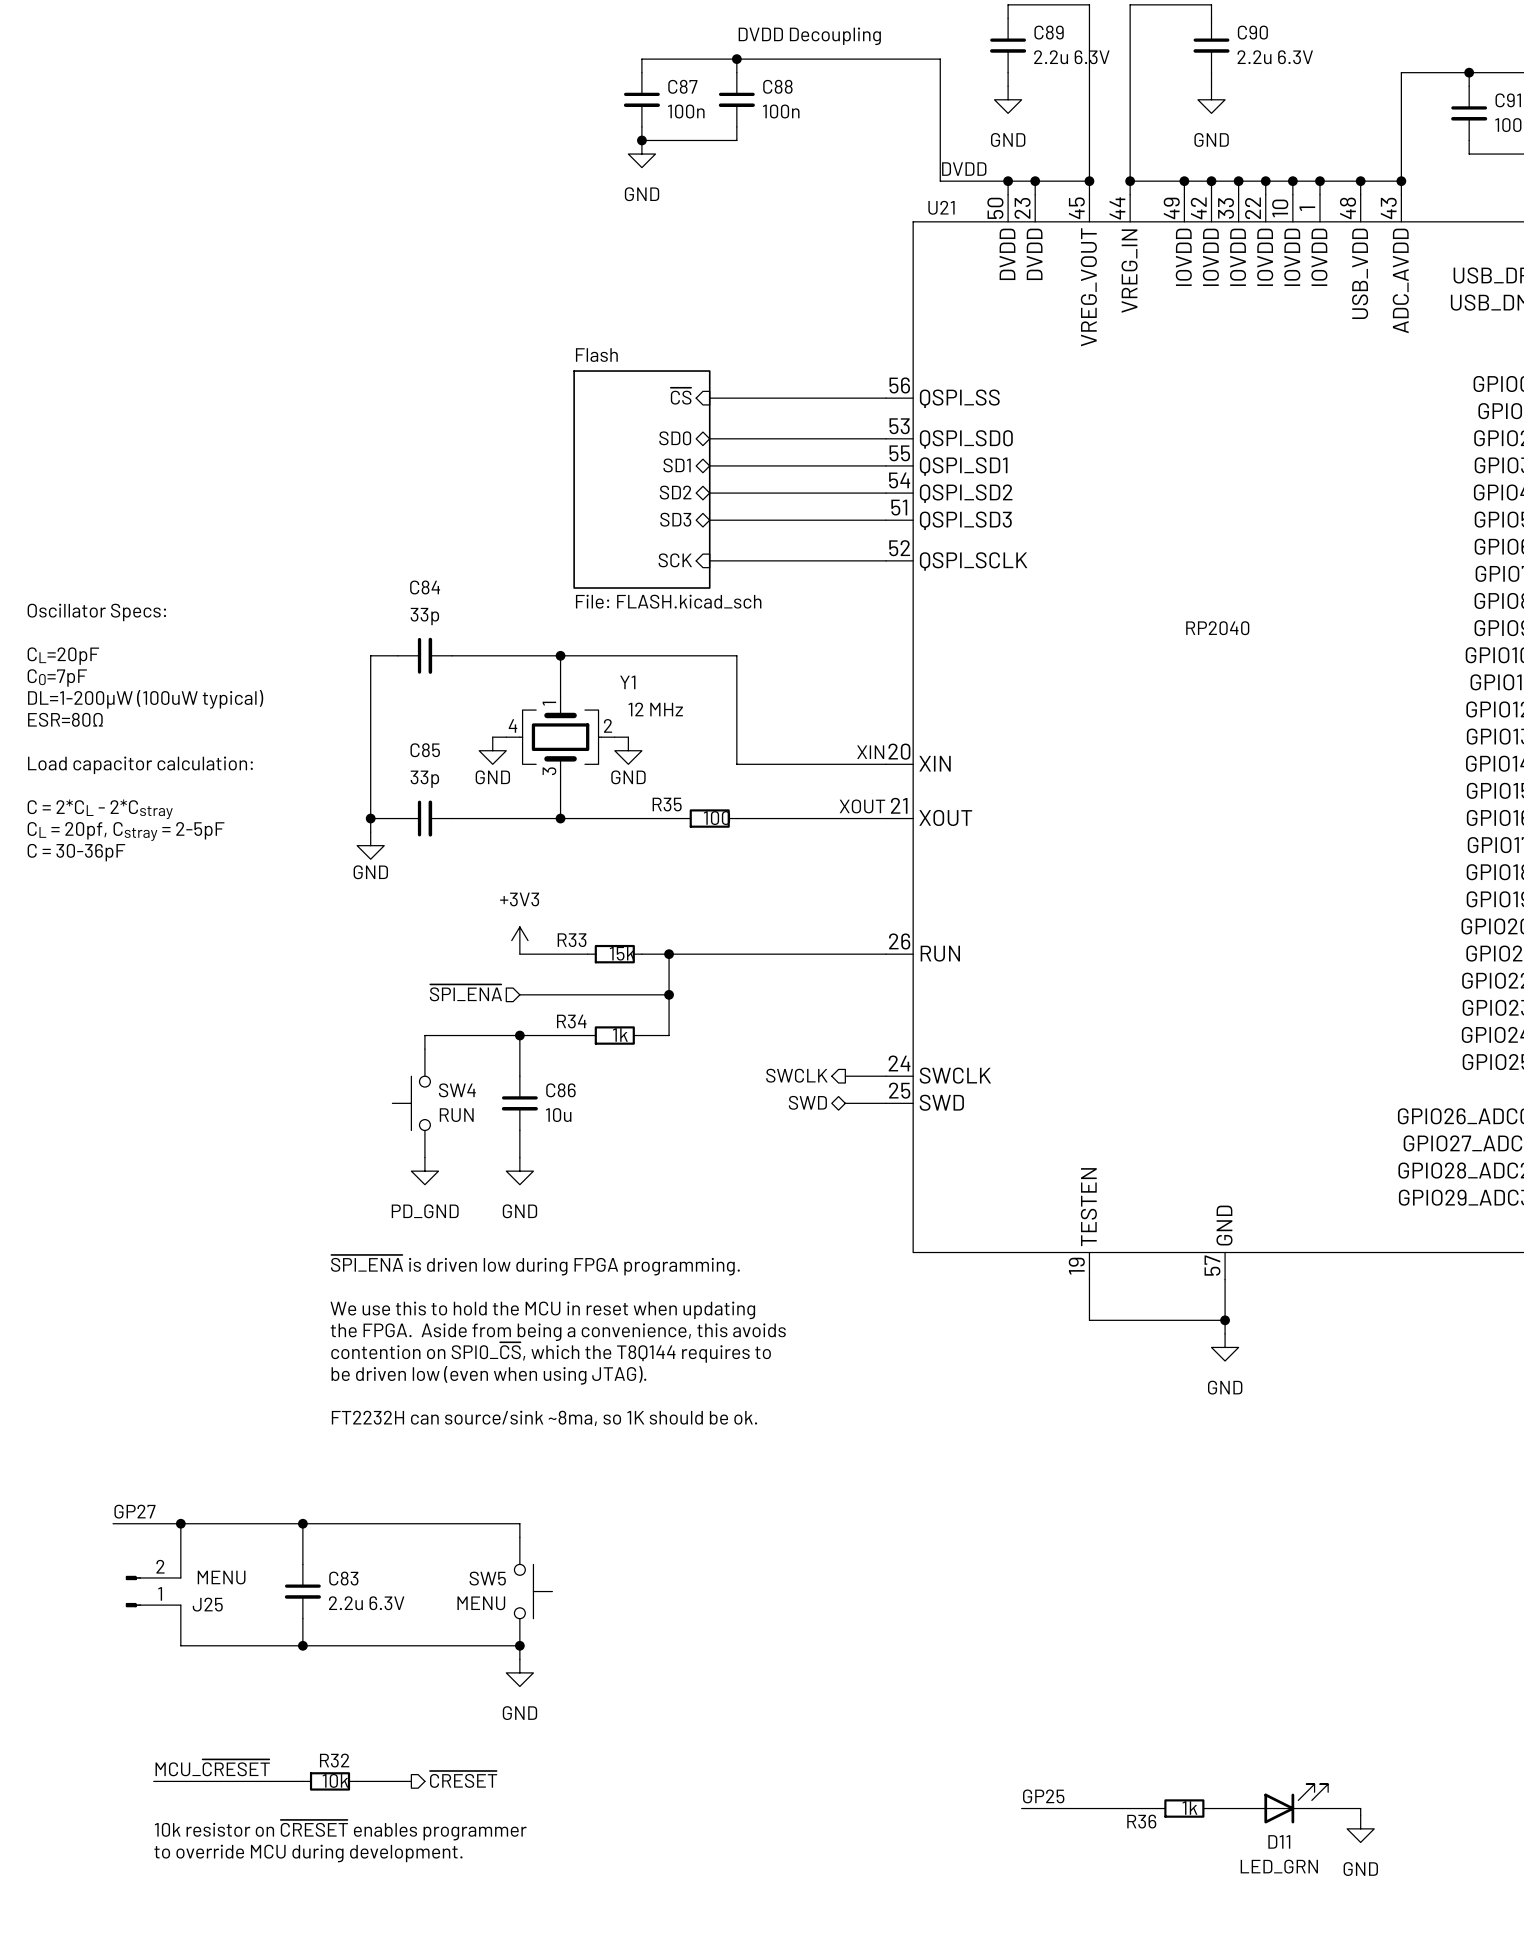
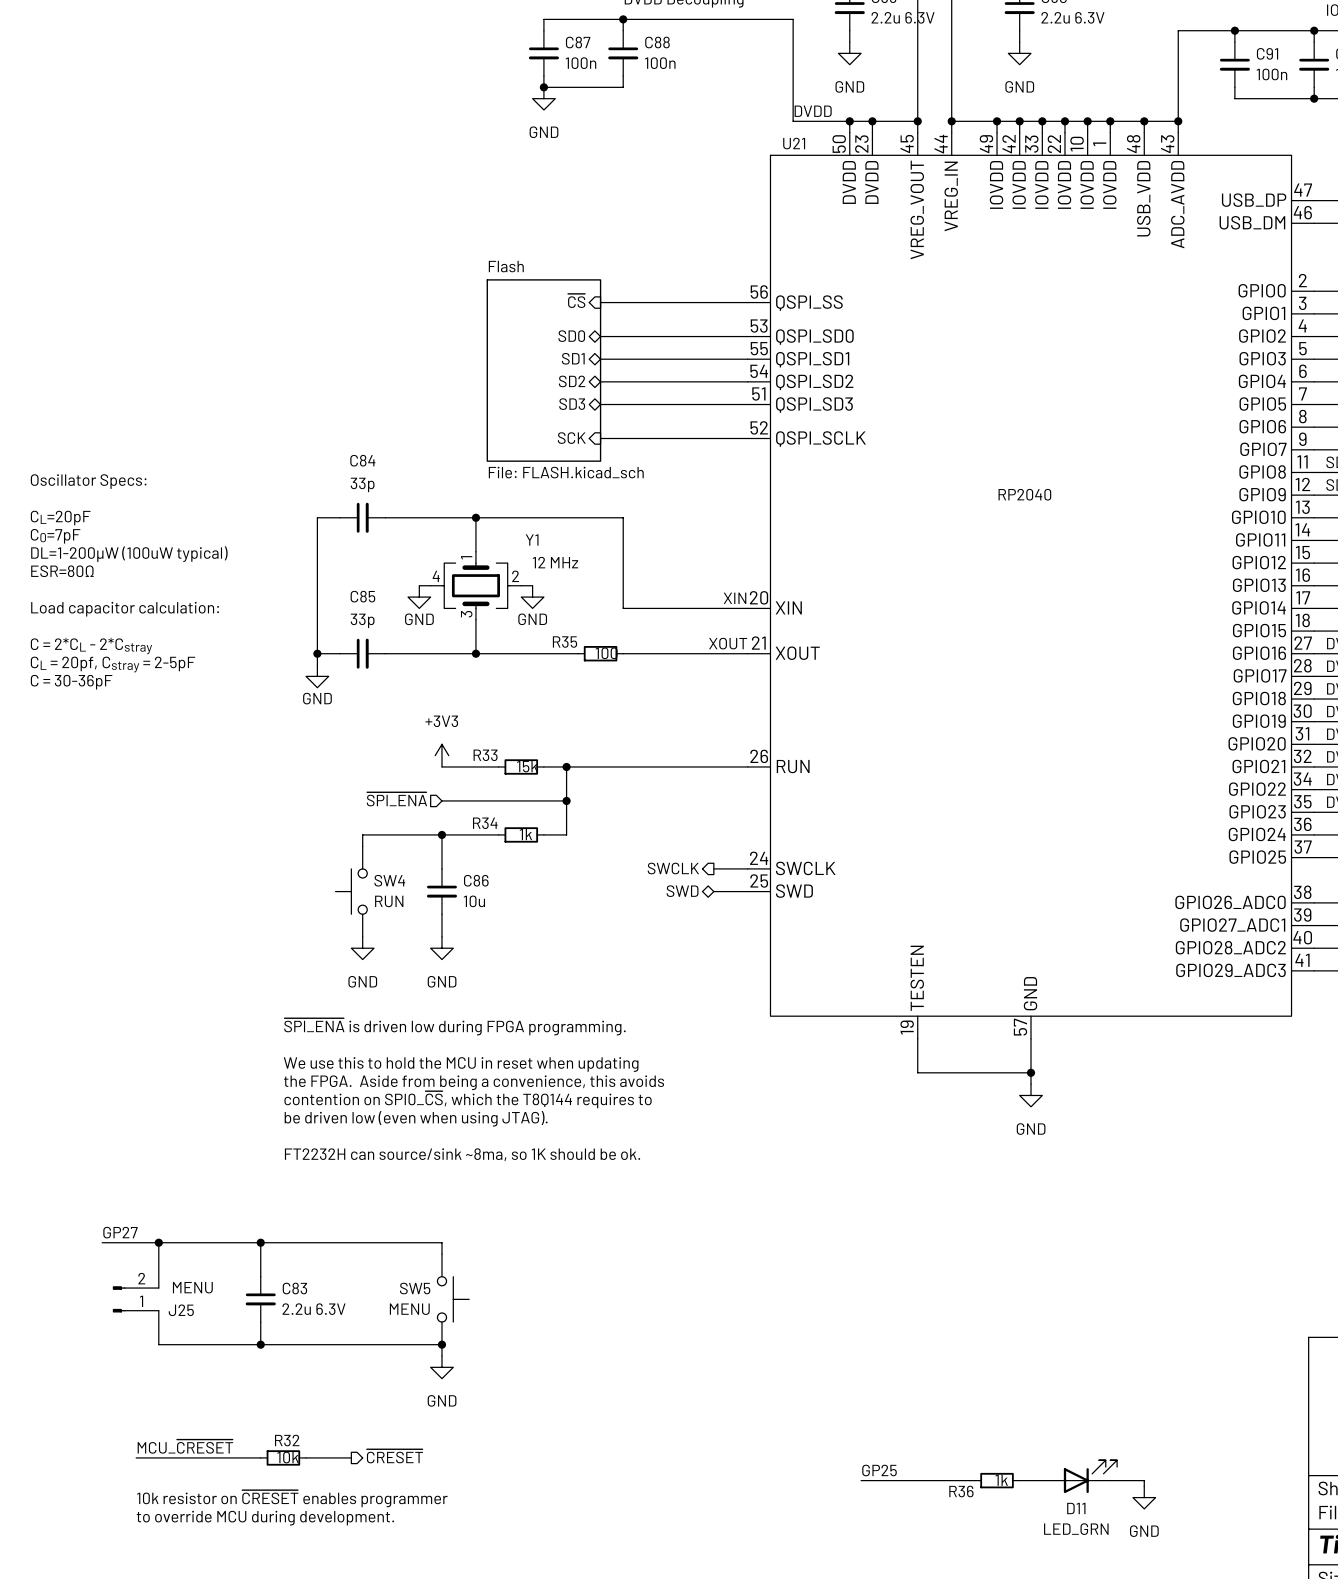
power symbol: PD_GND (424, 1171) -> GND (362, 948)

